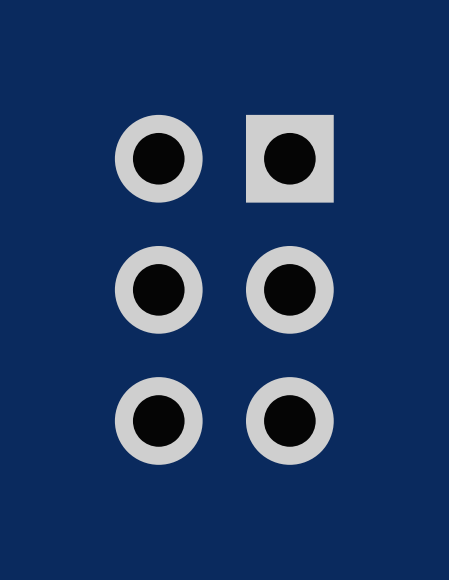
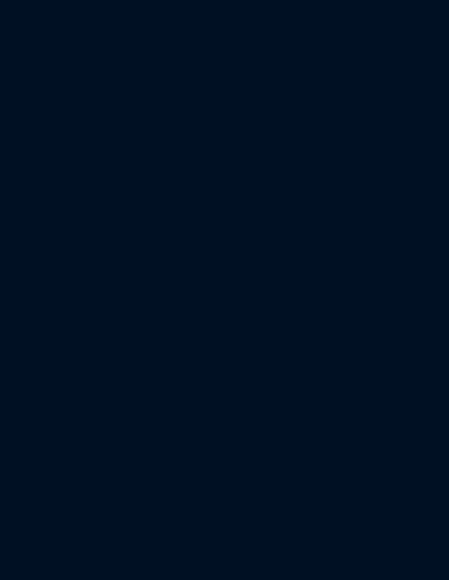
part: (224, 289) -> none

